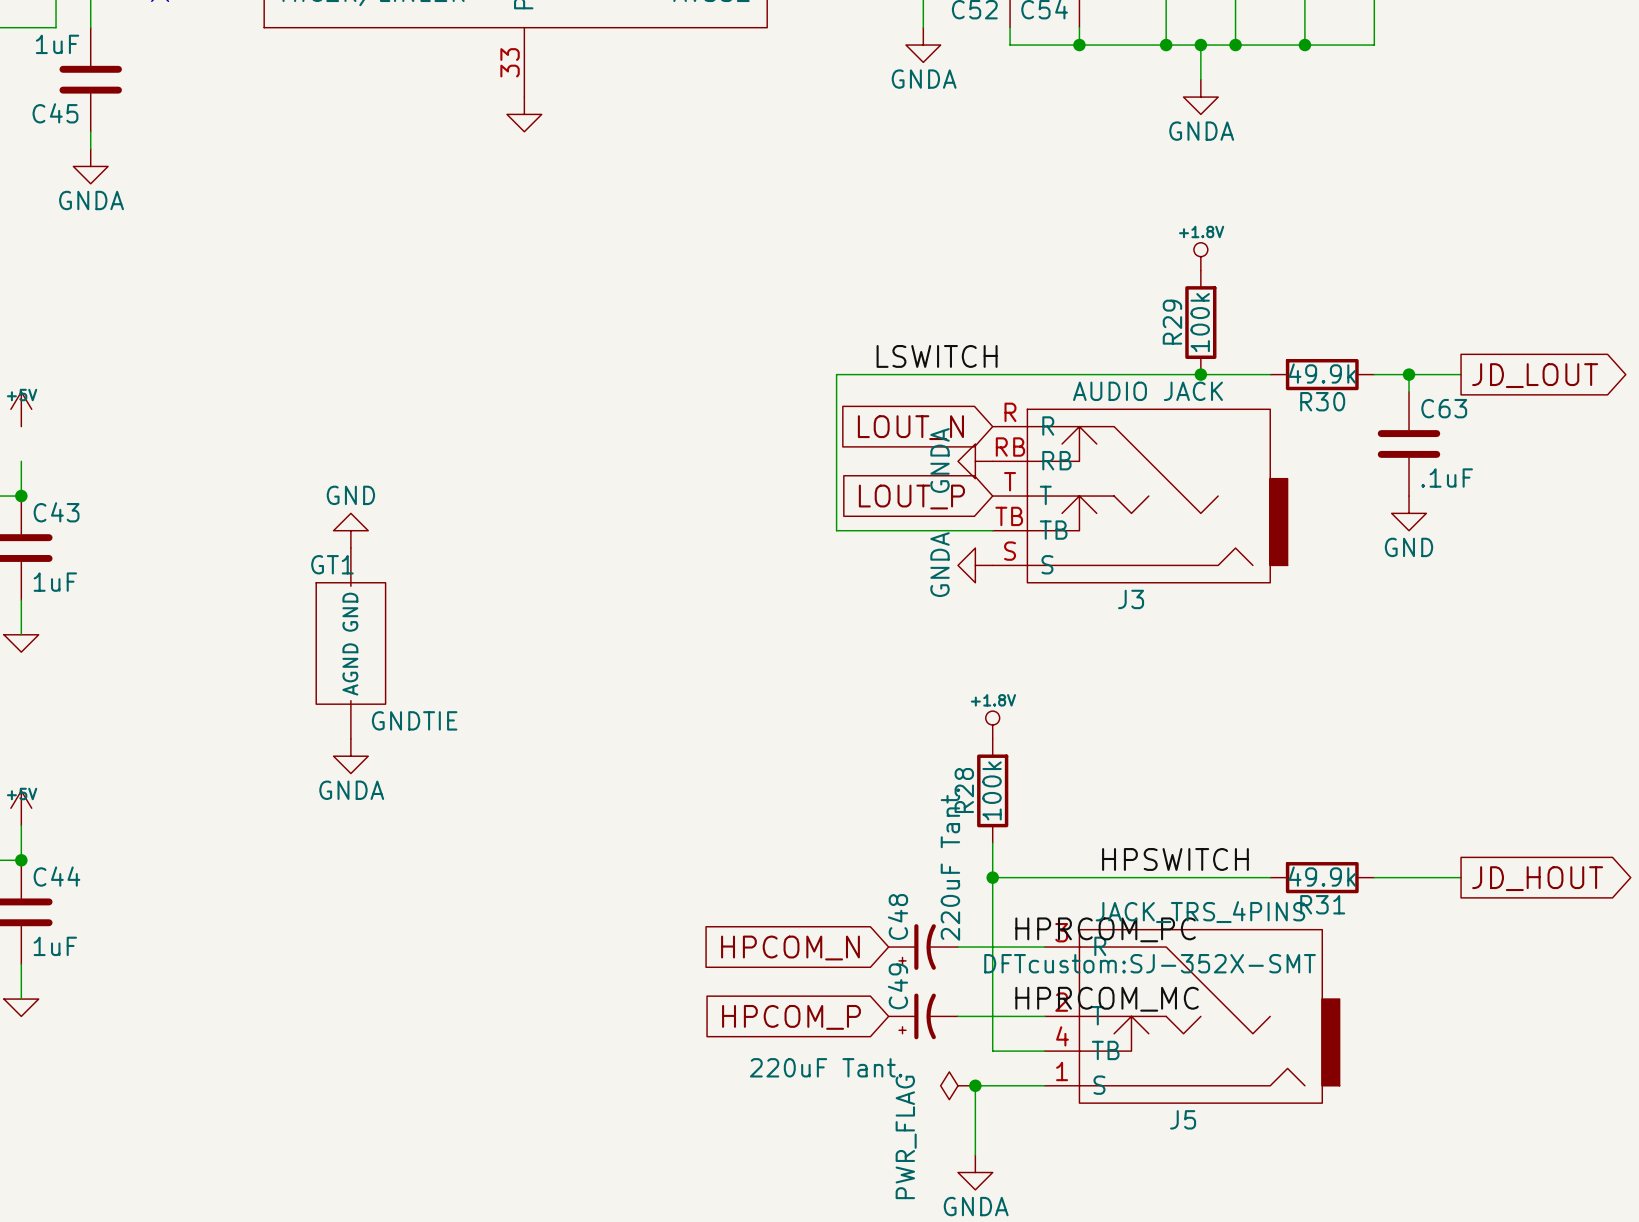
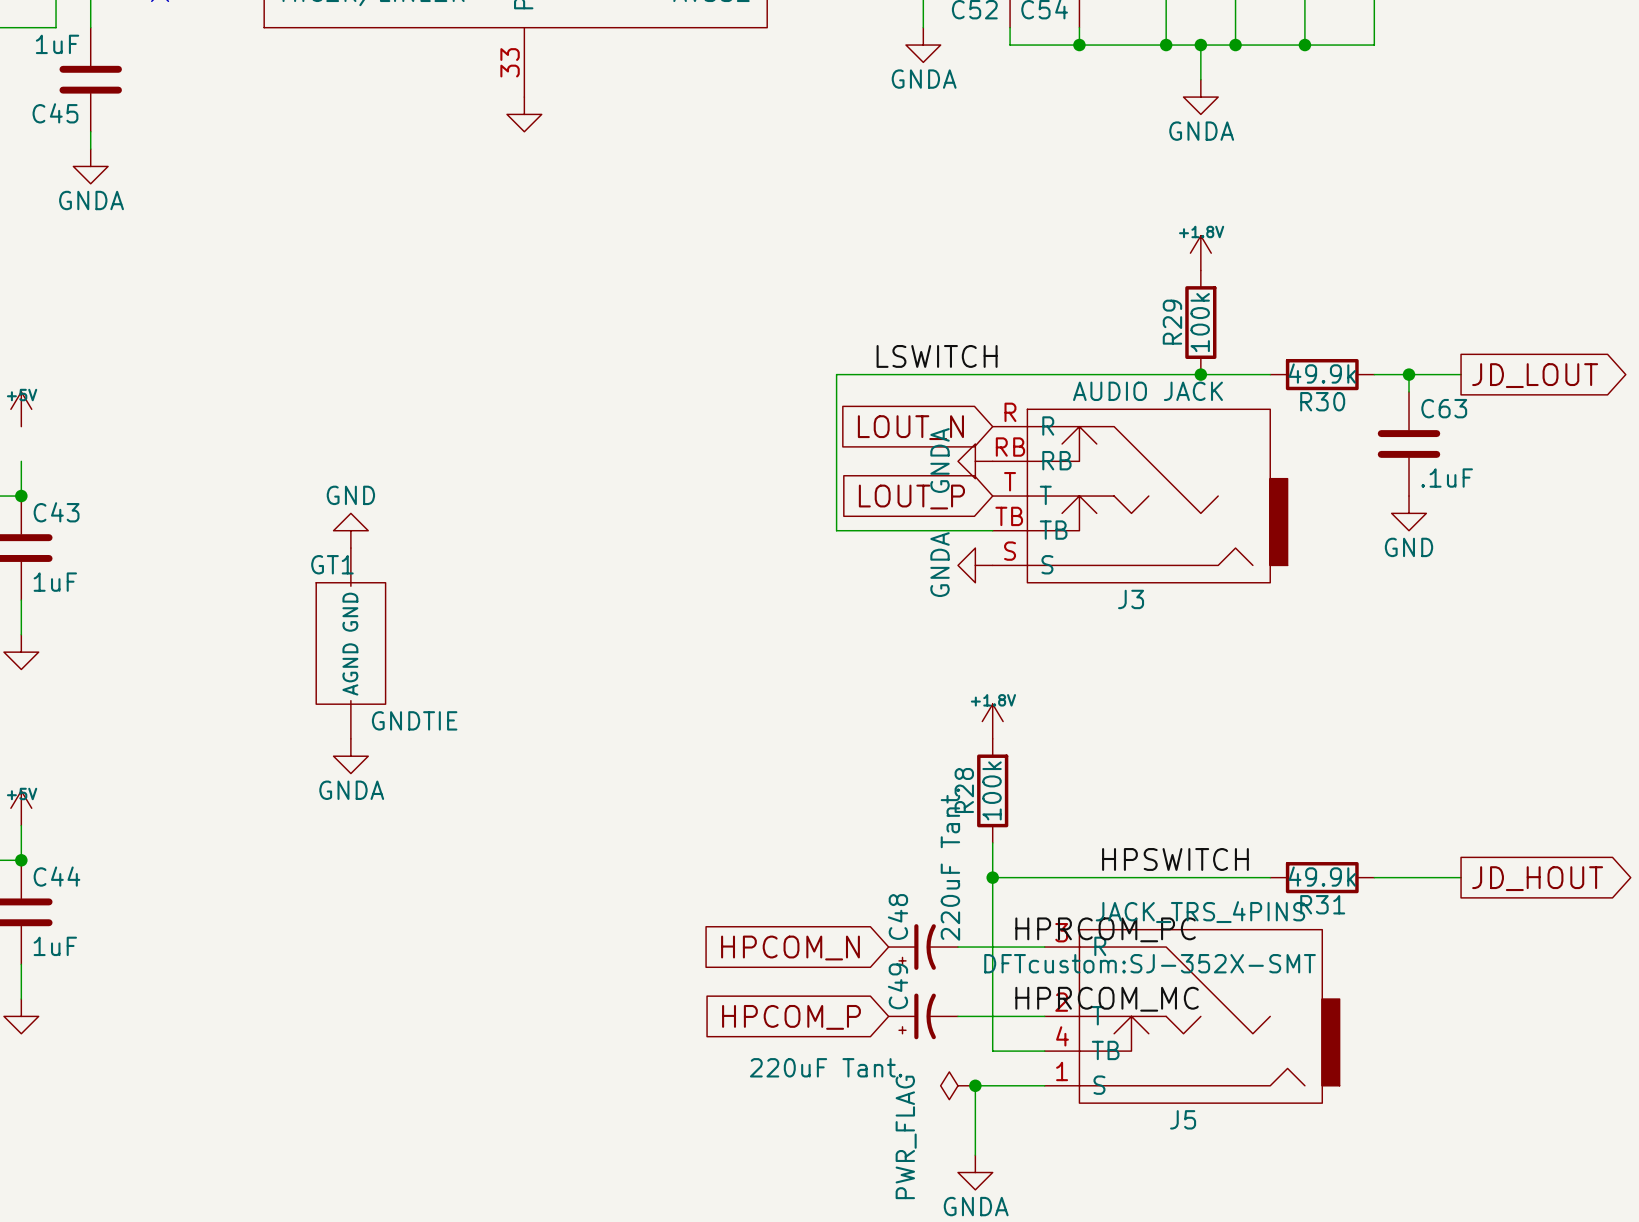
power symbol shape: [1193, 242, 1208, 271] -> [1190, 235, 1212, 271]
power symbol shape: [3, 634, 39, 653] -> [3, 634, 39, 670]
power symbol shape: [985, 711, 1000, 739] -> [982, 704, 1004, 739]
power symbol shape: [3, 999, 39, 1017] -> [3, 999, 39, 1034]

